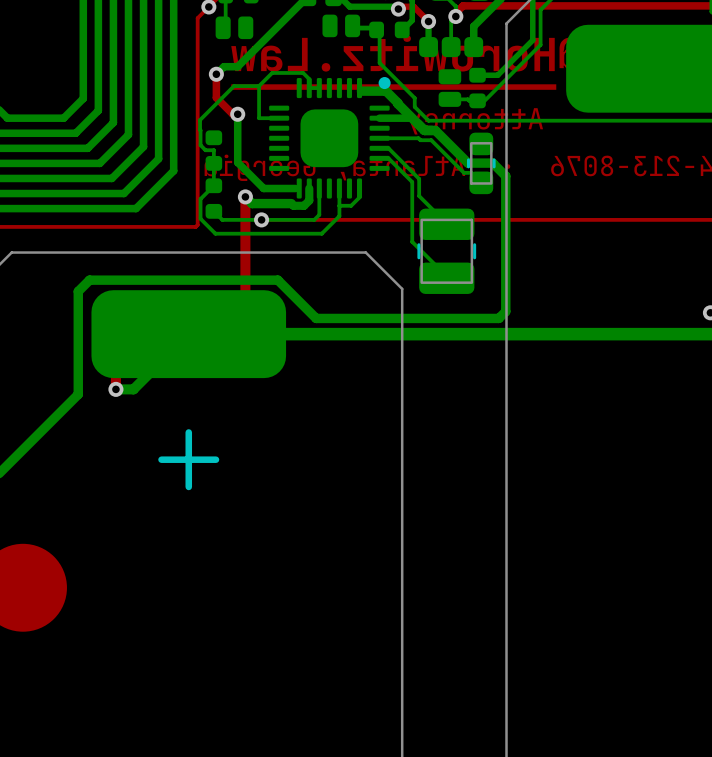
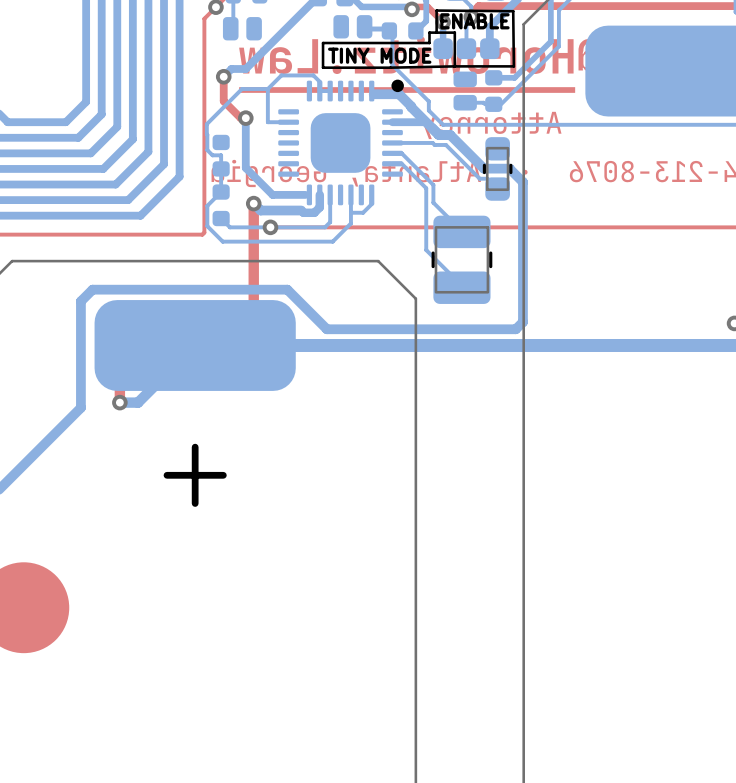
text: none -> ENABLE (474, 21)
line: none -> (436, 32) (436, 10) (513, 11) (513, 66) (323, 67) (323, 43) (429, 43) (429, 32) (454, 32) (454, 66)
text: none -> TINY MODE (379, 55)

